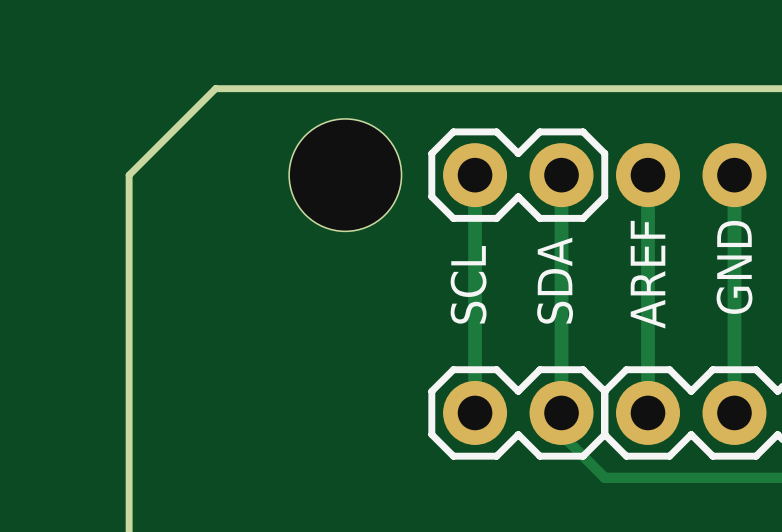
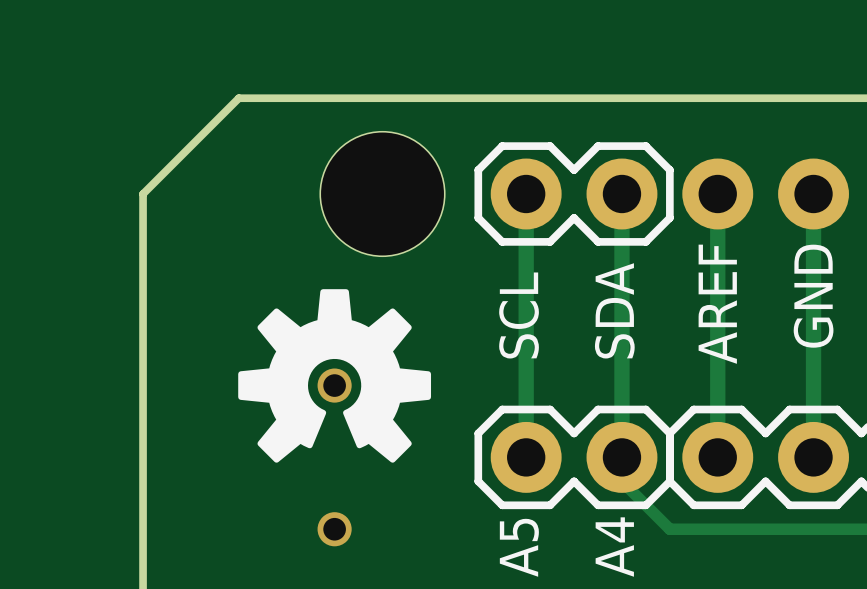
drawing: none -> [238, 289, 432, 463]
via: none -> (334, 385)
via: none -> (334, 529)
text: none -> A4 (614, 547)
text: none -> A5 (519, 547)

